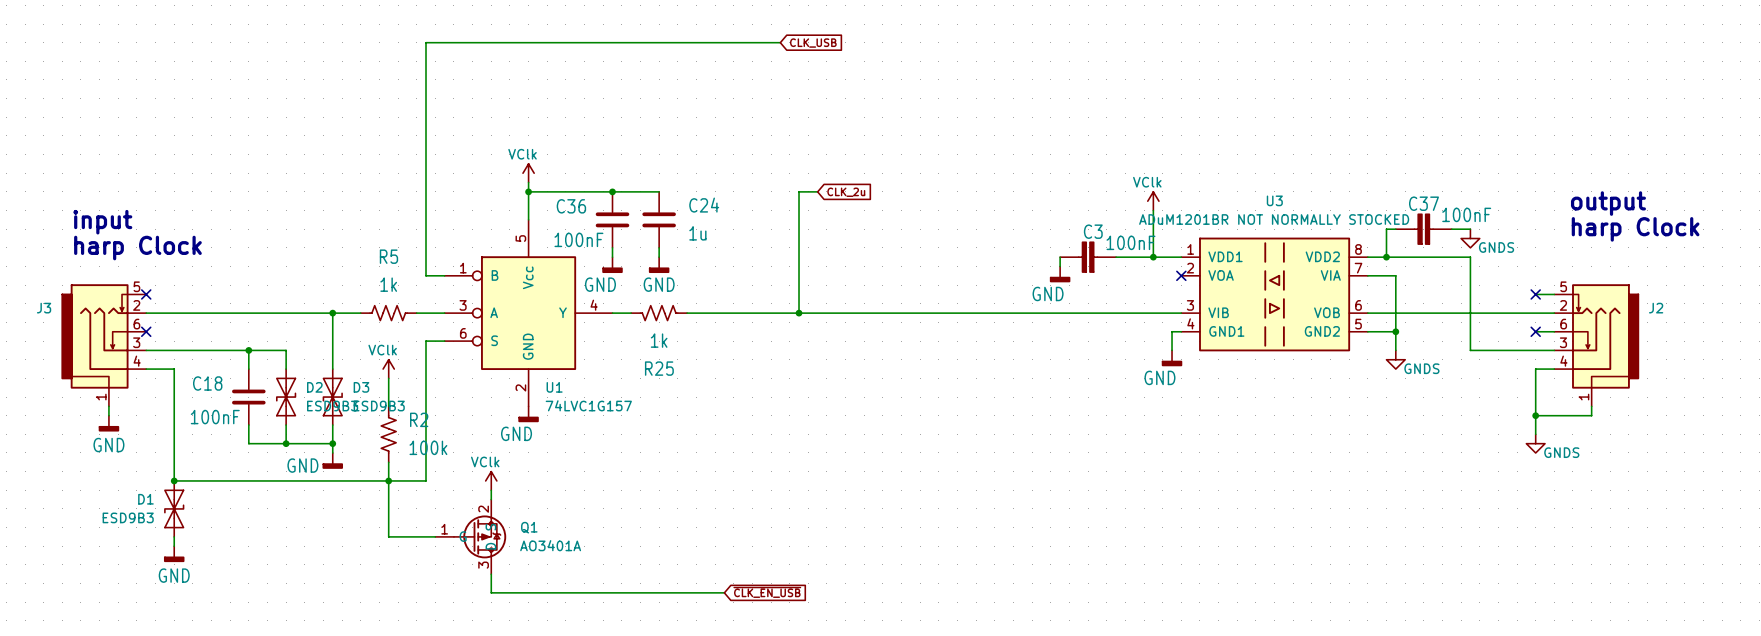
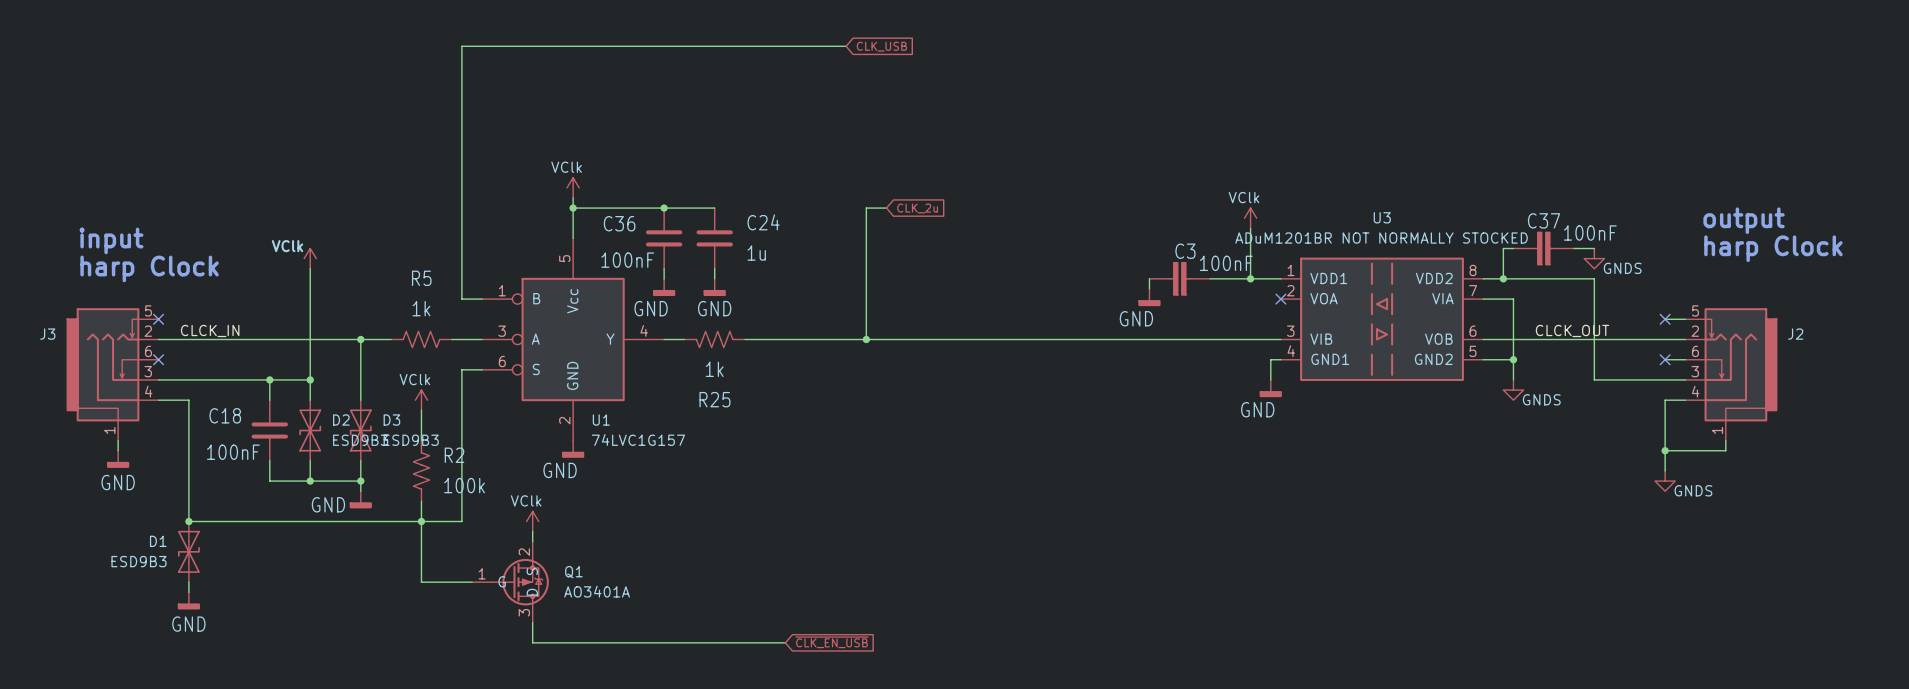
power symbol: none -> VClk (310, 258)
wire: none -> (310, 268) (310, 379)
label: none -> CLCK_IN (210, 330)
label: none -> CLCK_OUT (1572, 330)
junction: none -> (310, 379)

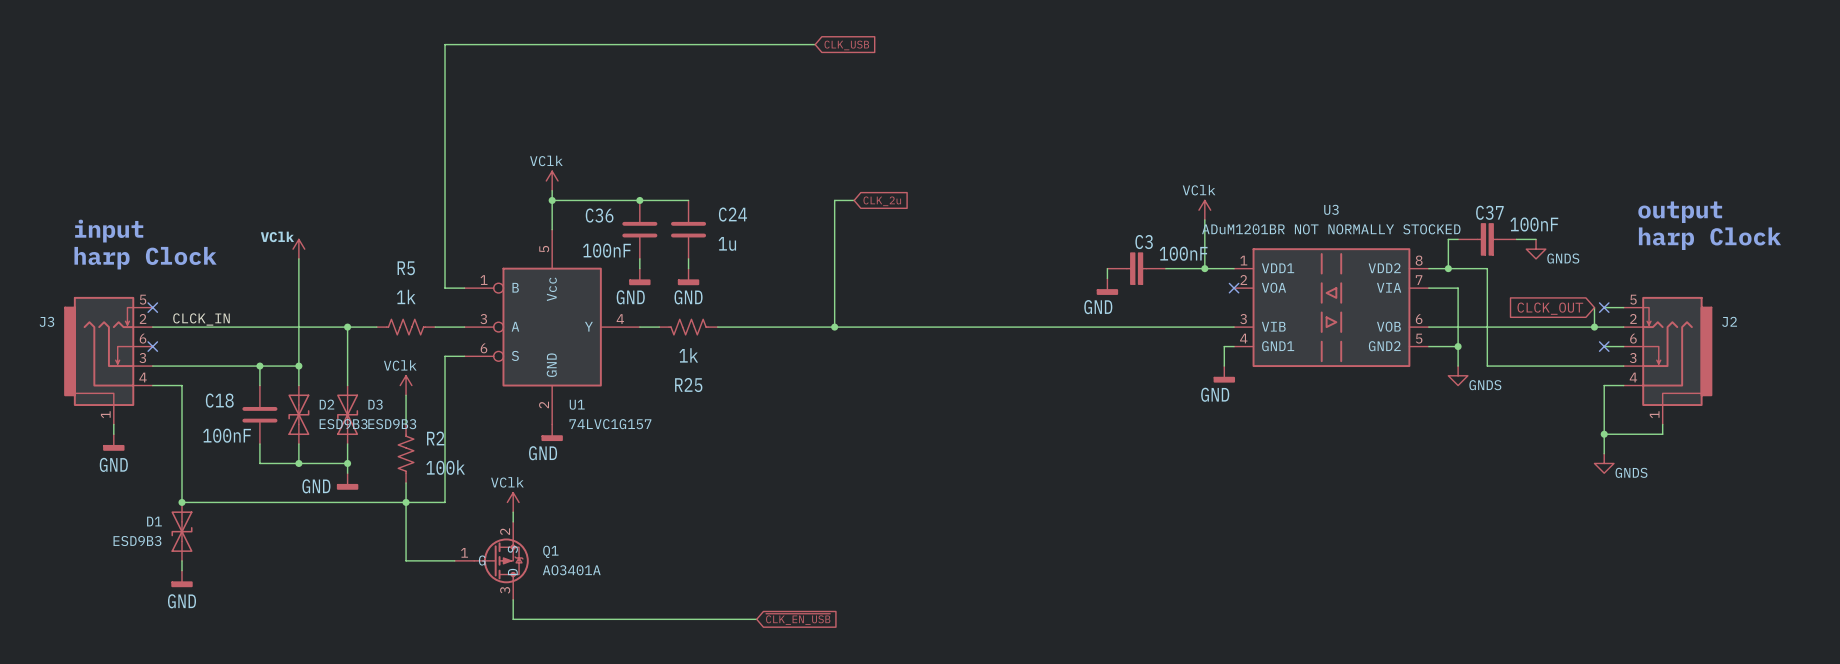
wire: (1543, 278) (1594, 278) (1594, 379) -> (1487, 268) (1487, 366) (1536, 366)
global label: none -> CLCK_OUT (1550, 308)
wire: none -> (1594, 307) (1594, 327)
label: CLCK_OUT (1572, 330) -> none
junction: none -> (1594, 327)

